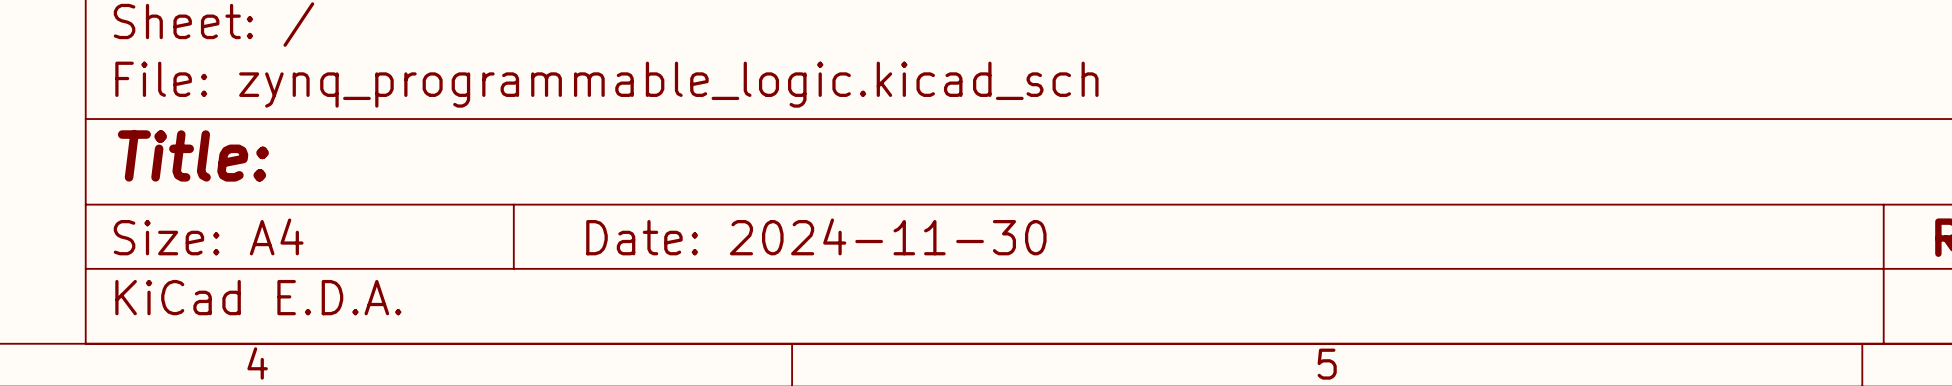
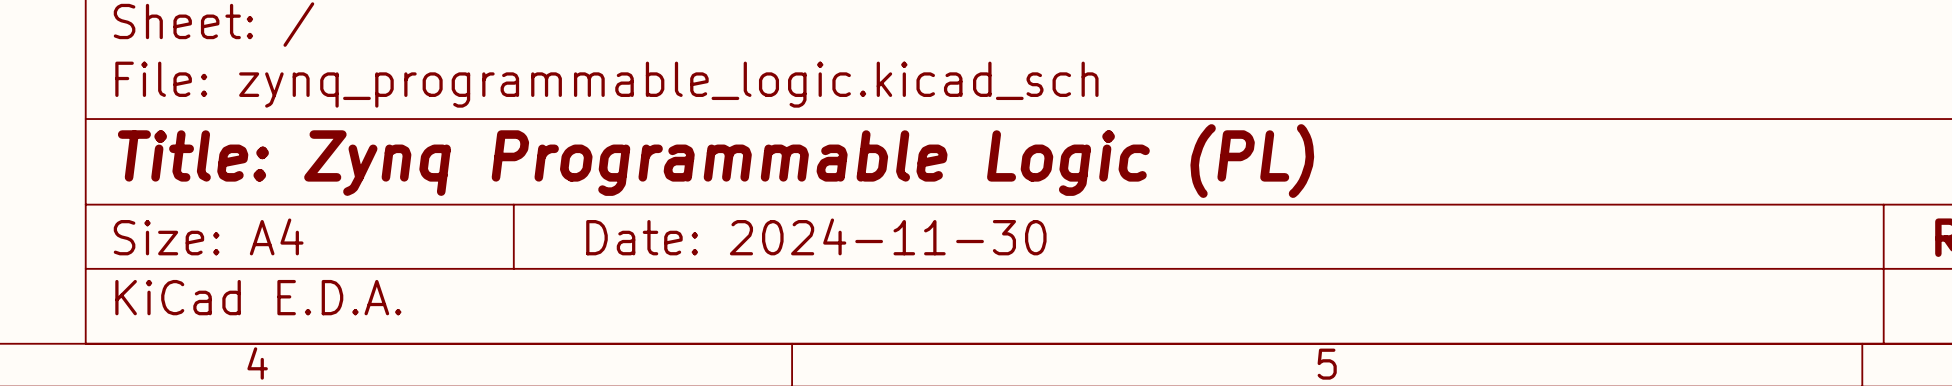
title block: Title: (193, 155) -> Title: Zynq Programmable Logic (PL) (716, 161)

